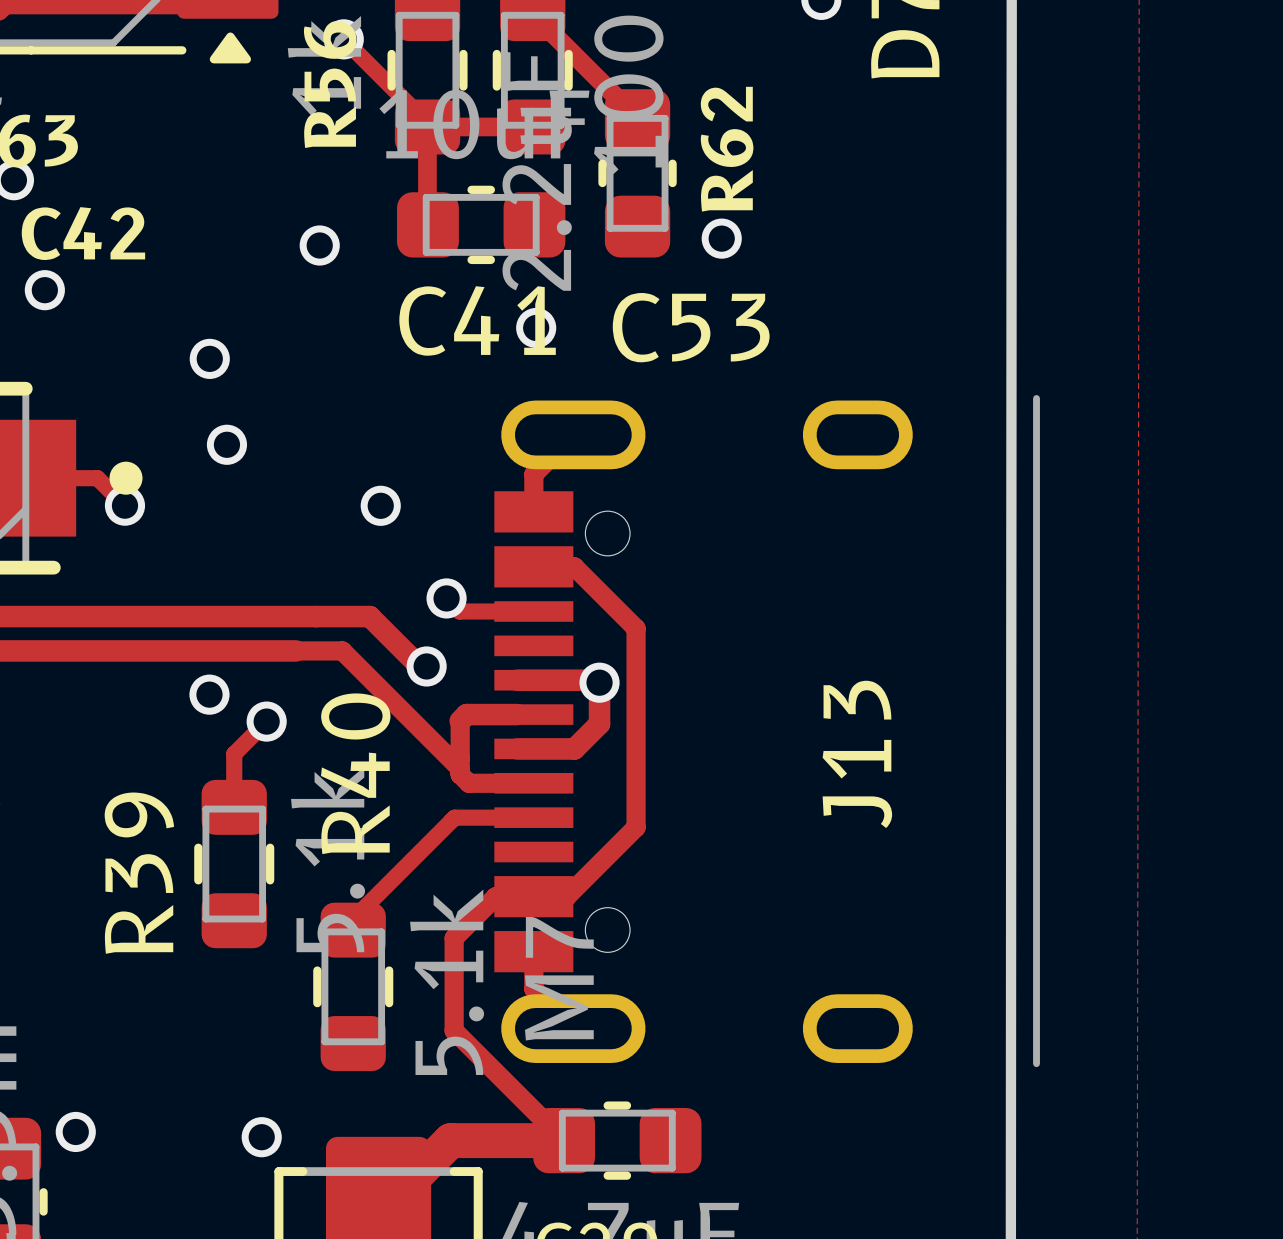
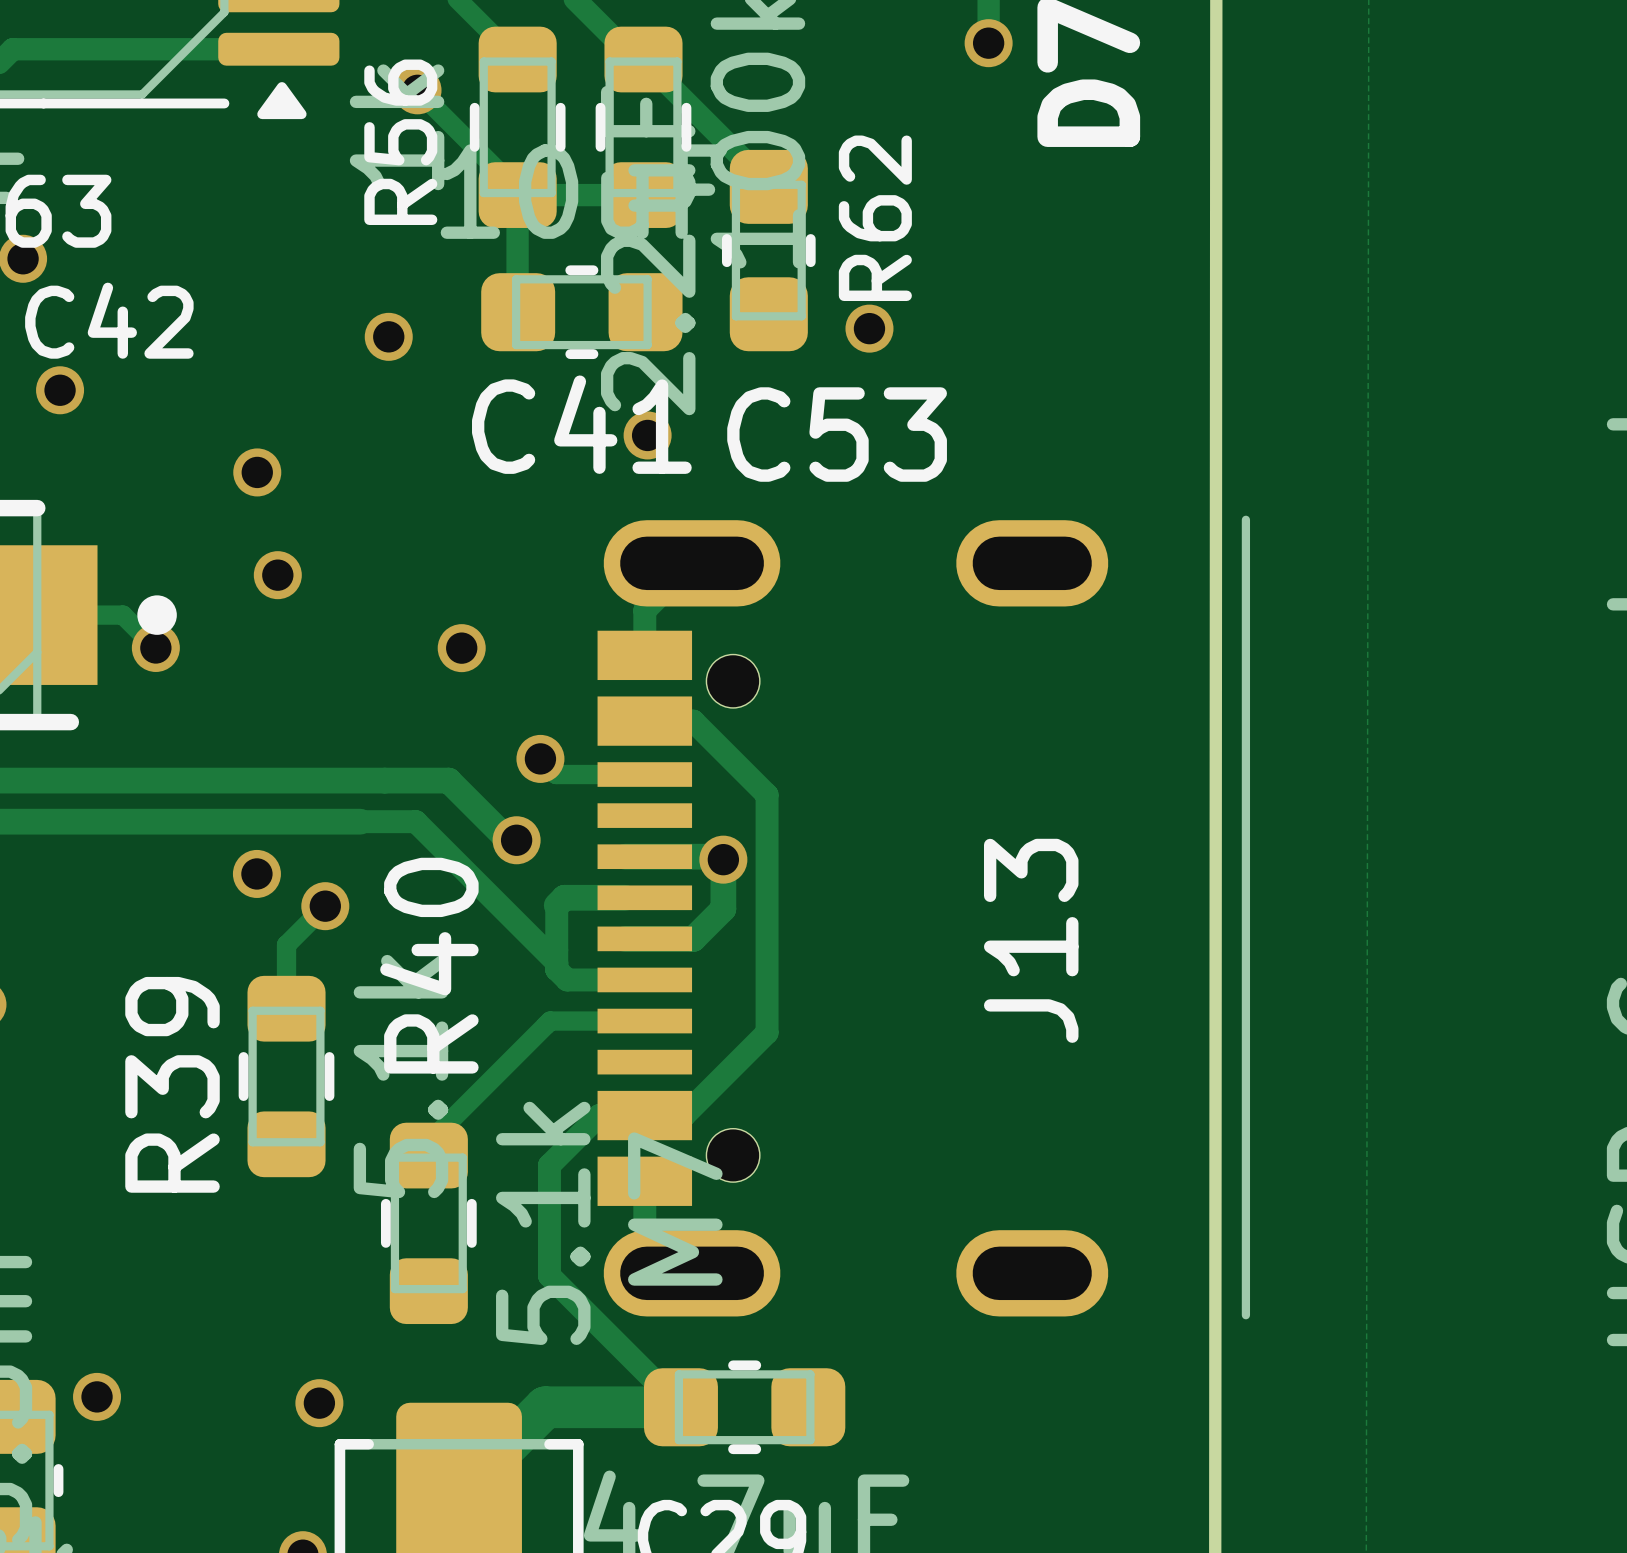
J13 footprint: [494, 395, 1040, 1068] -> [597, 515, 1251, 1320]

